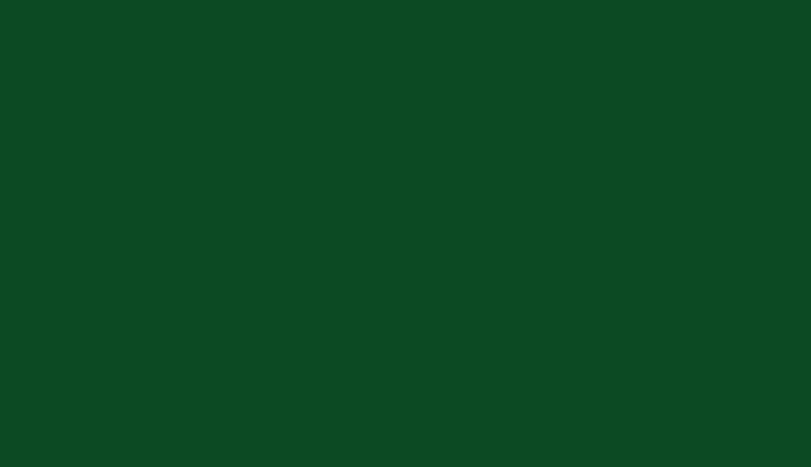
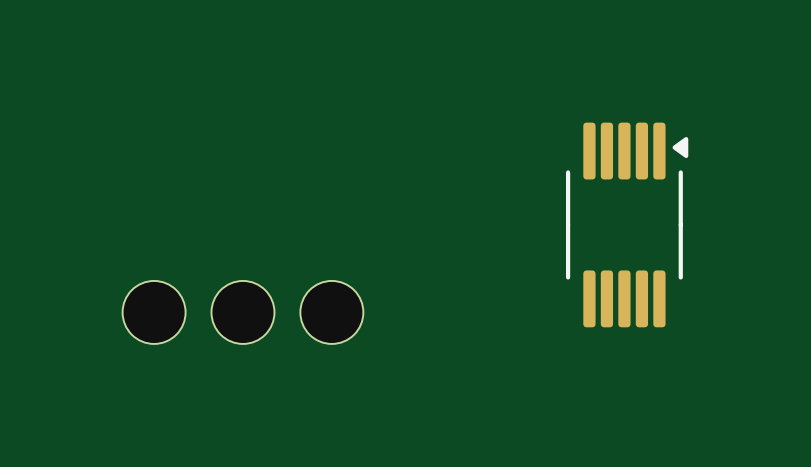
part: none -> (627, 224)
part: none -> (242, 312)

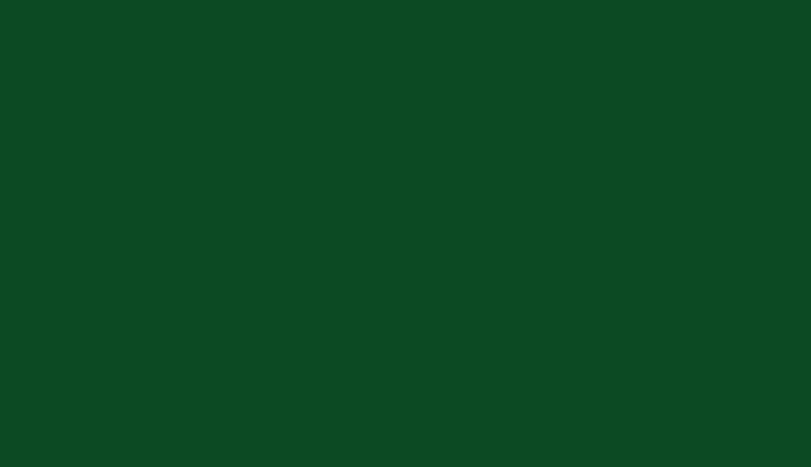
part: (627, 224) -> none
part: (242, 312) -> none

